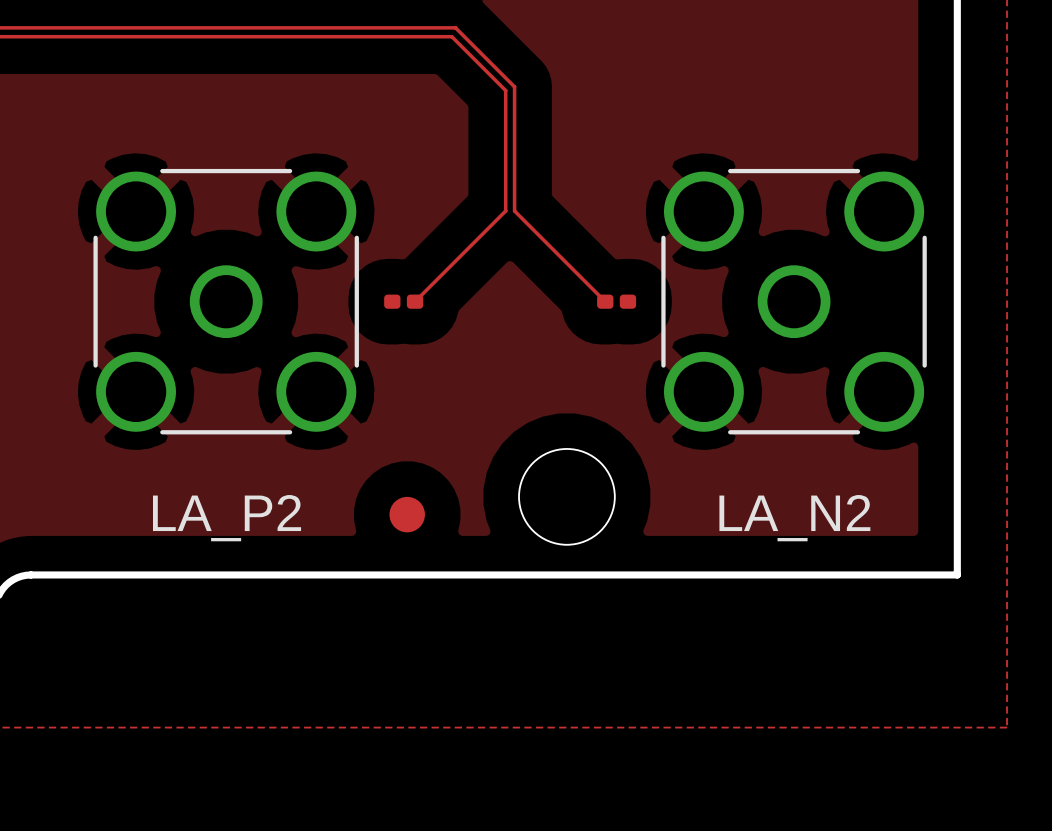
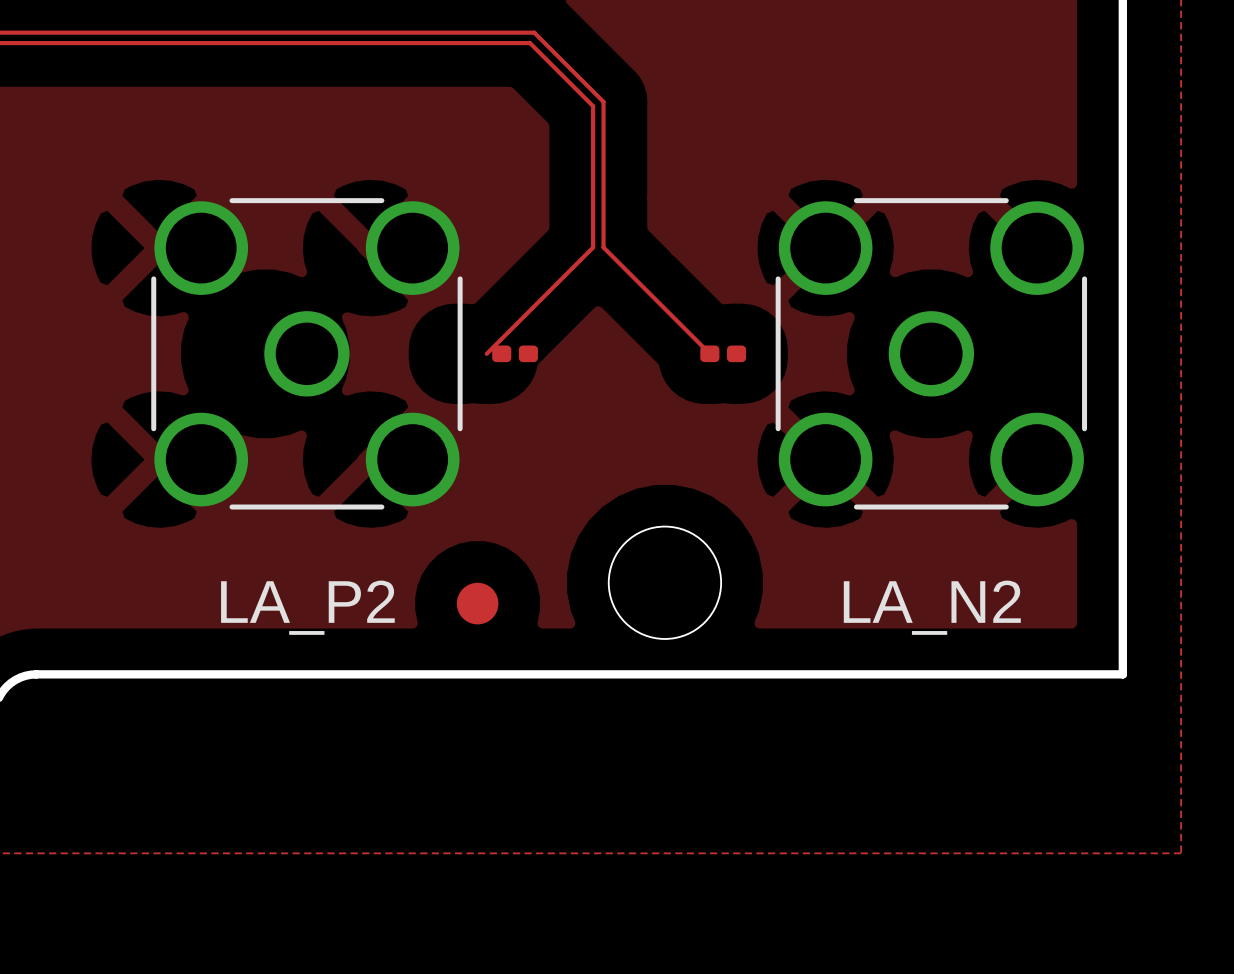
part position: (226, 301) -> (306, 353)
part position: (403, 301) -> (515, 353)
text position: LA_P2 (227, 518) -> LA_P2 (307, 607)

